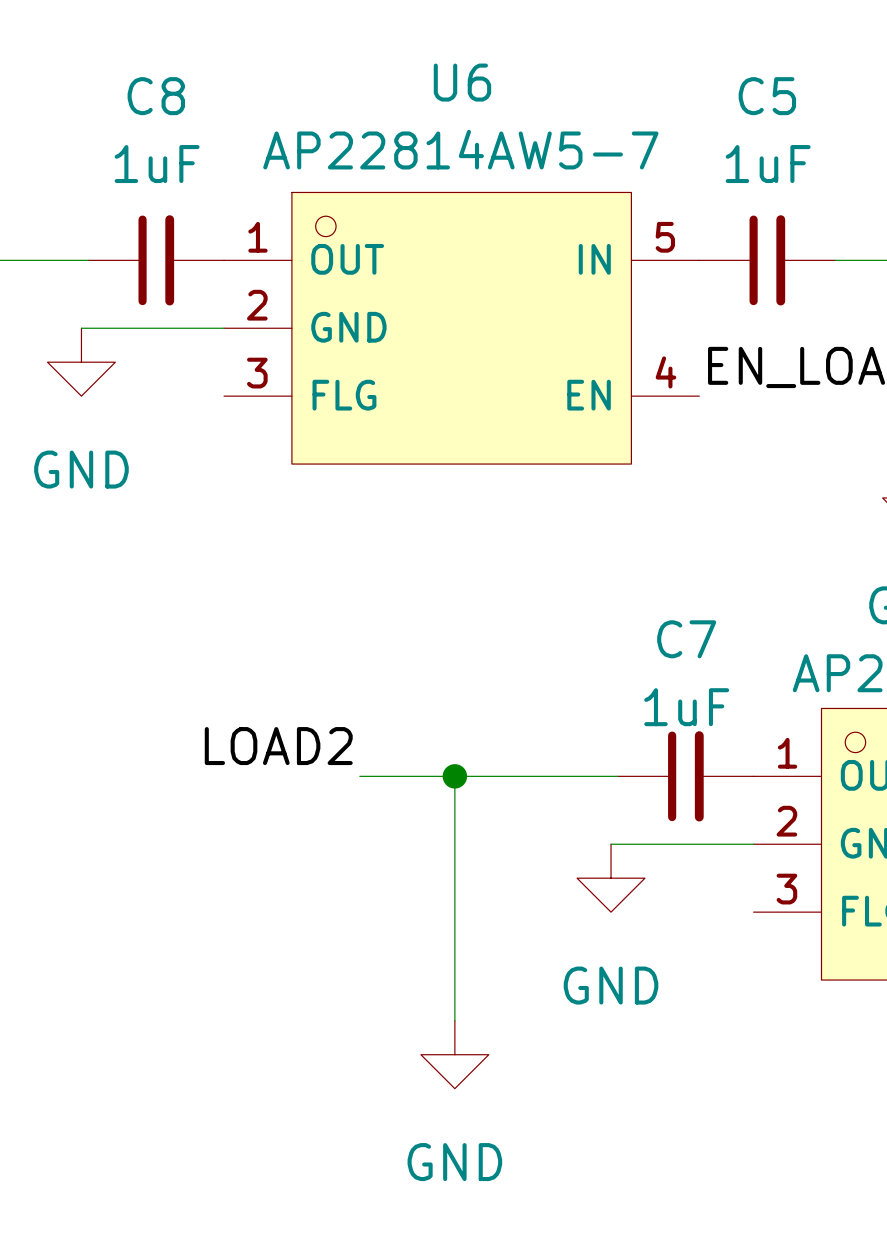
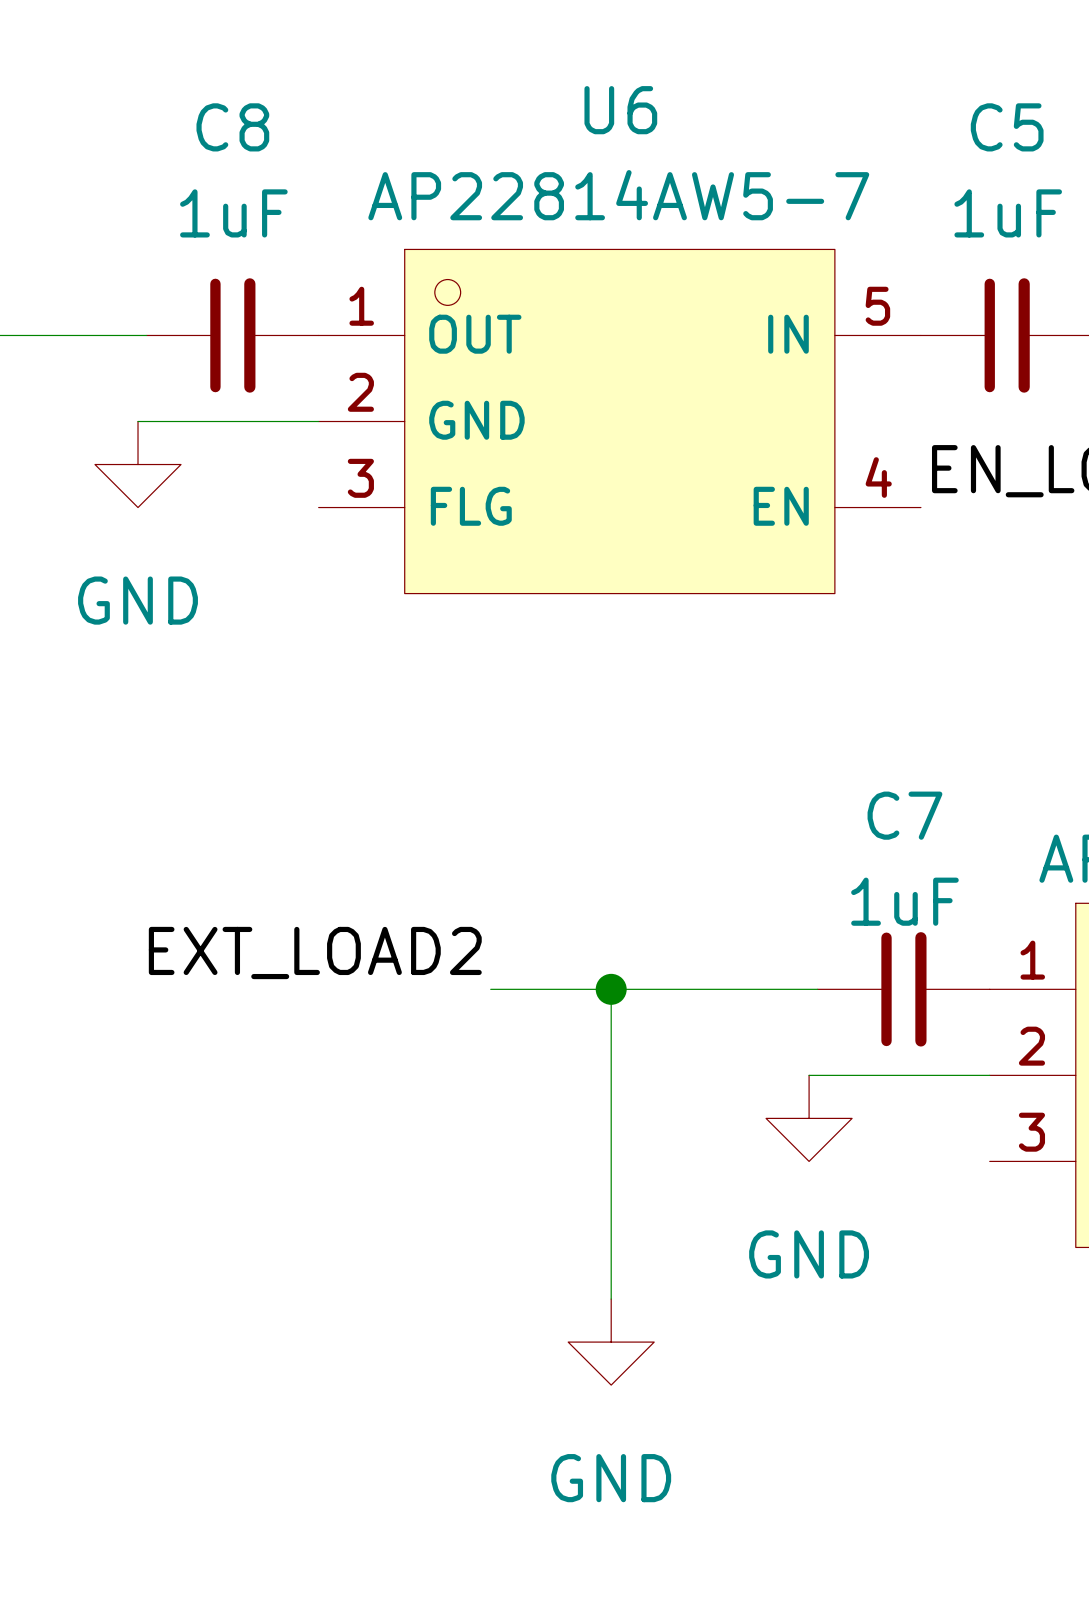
label: LOAD2 (278, 746) -> EXT_LOAD2 (315, 953)

